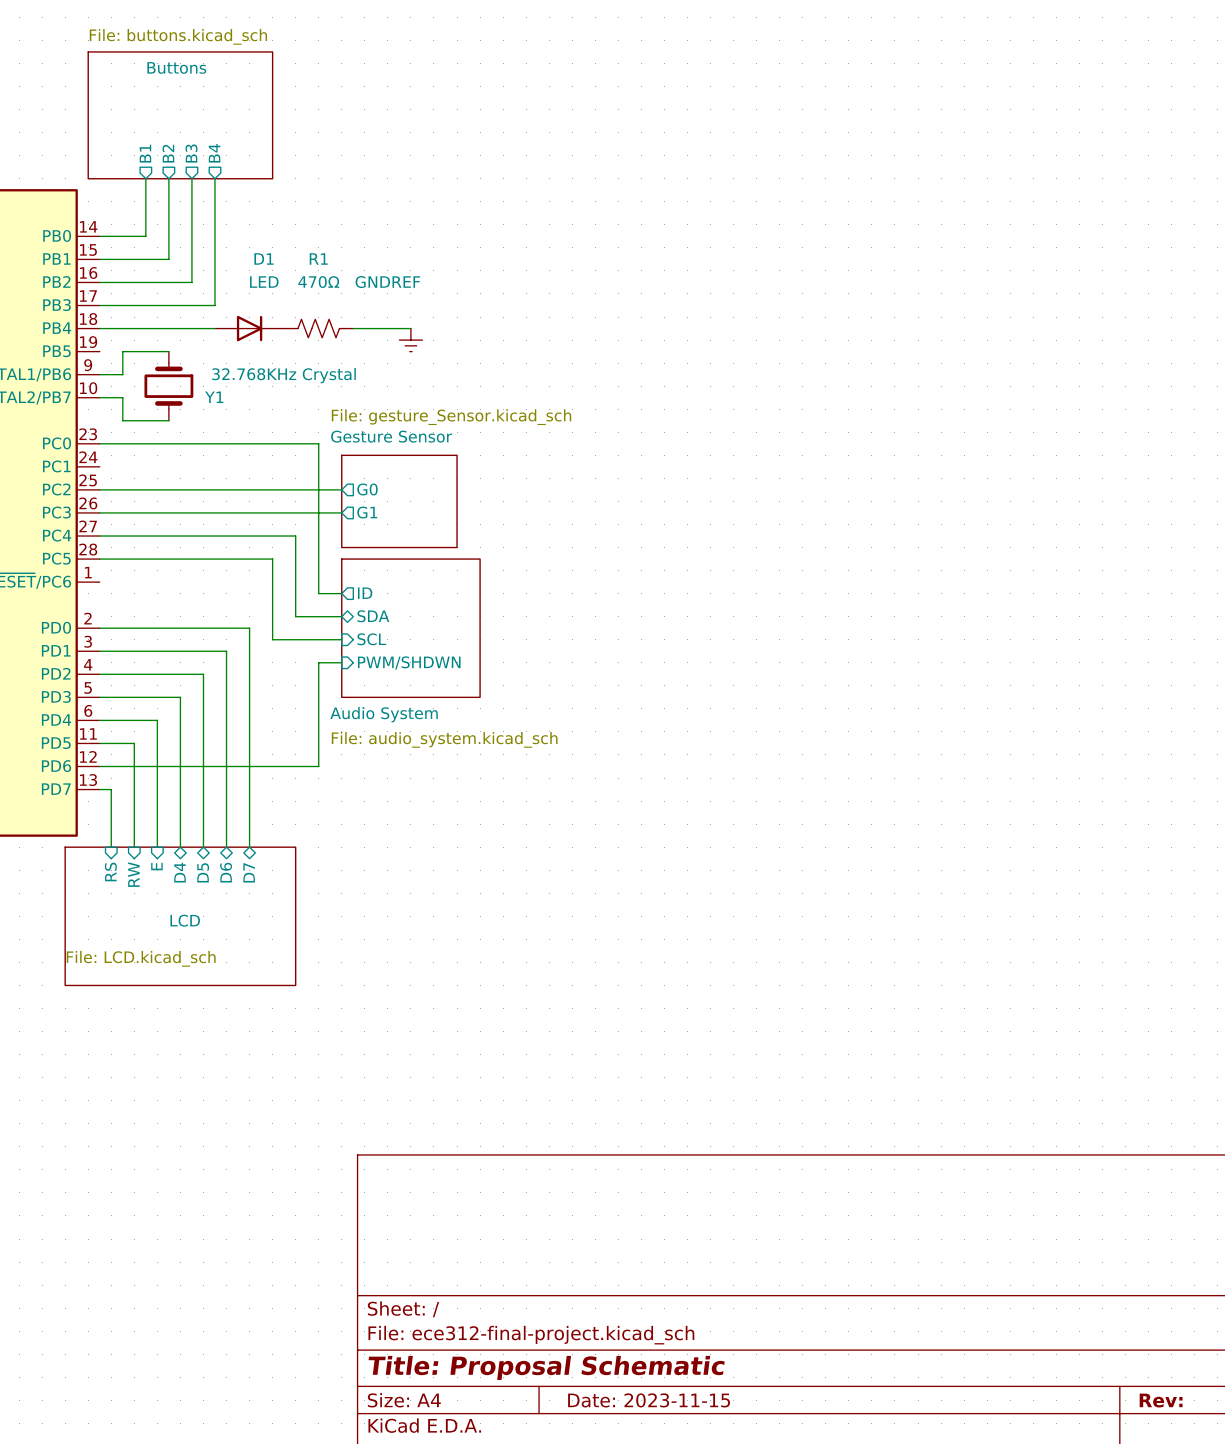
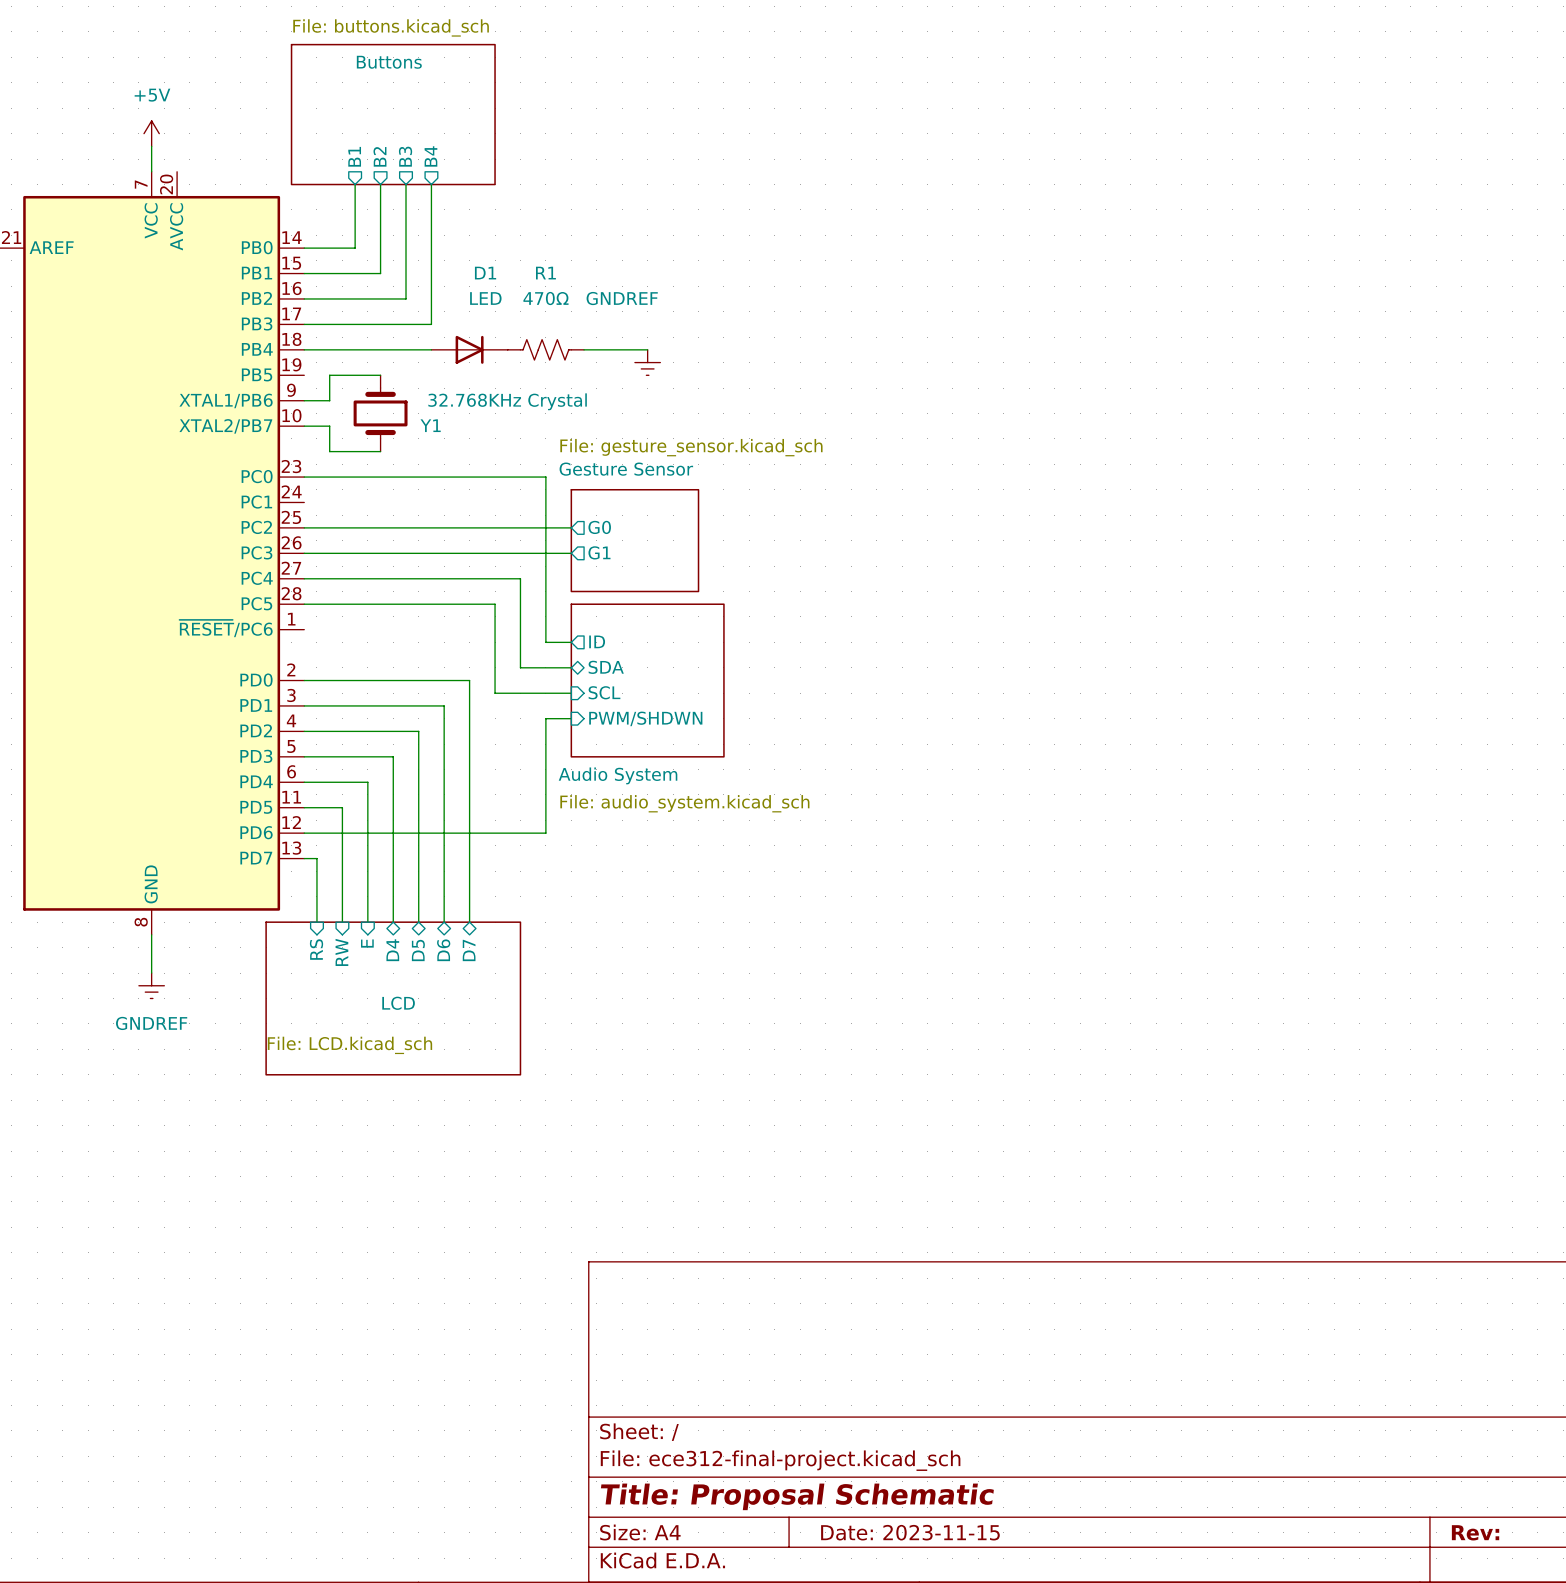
sheet Gesture Sensor value: File: gesture_Sensor.kicad_sch (451, 417) -> File: gesture_sensor.kicad_sch (691, 447)

